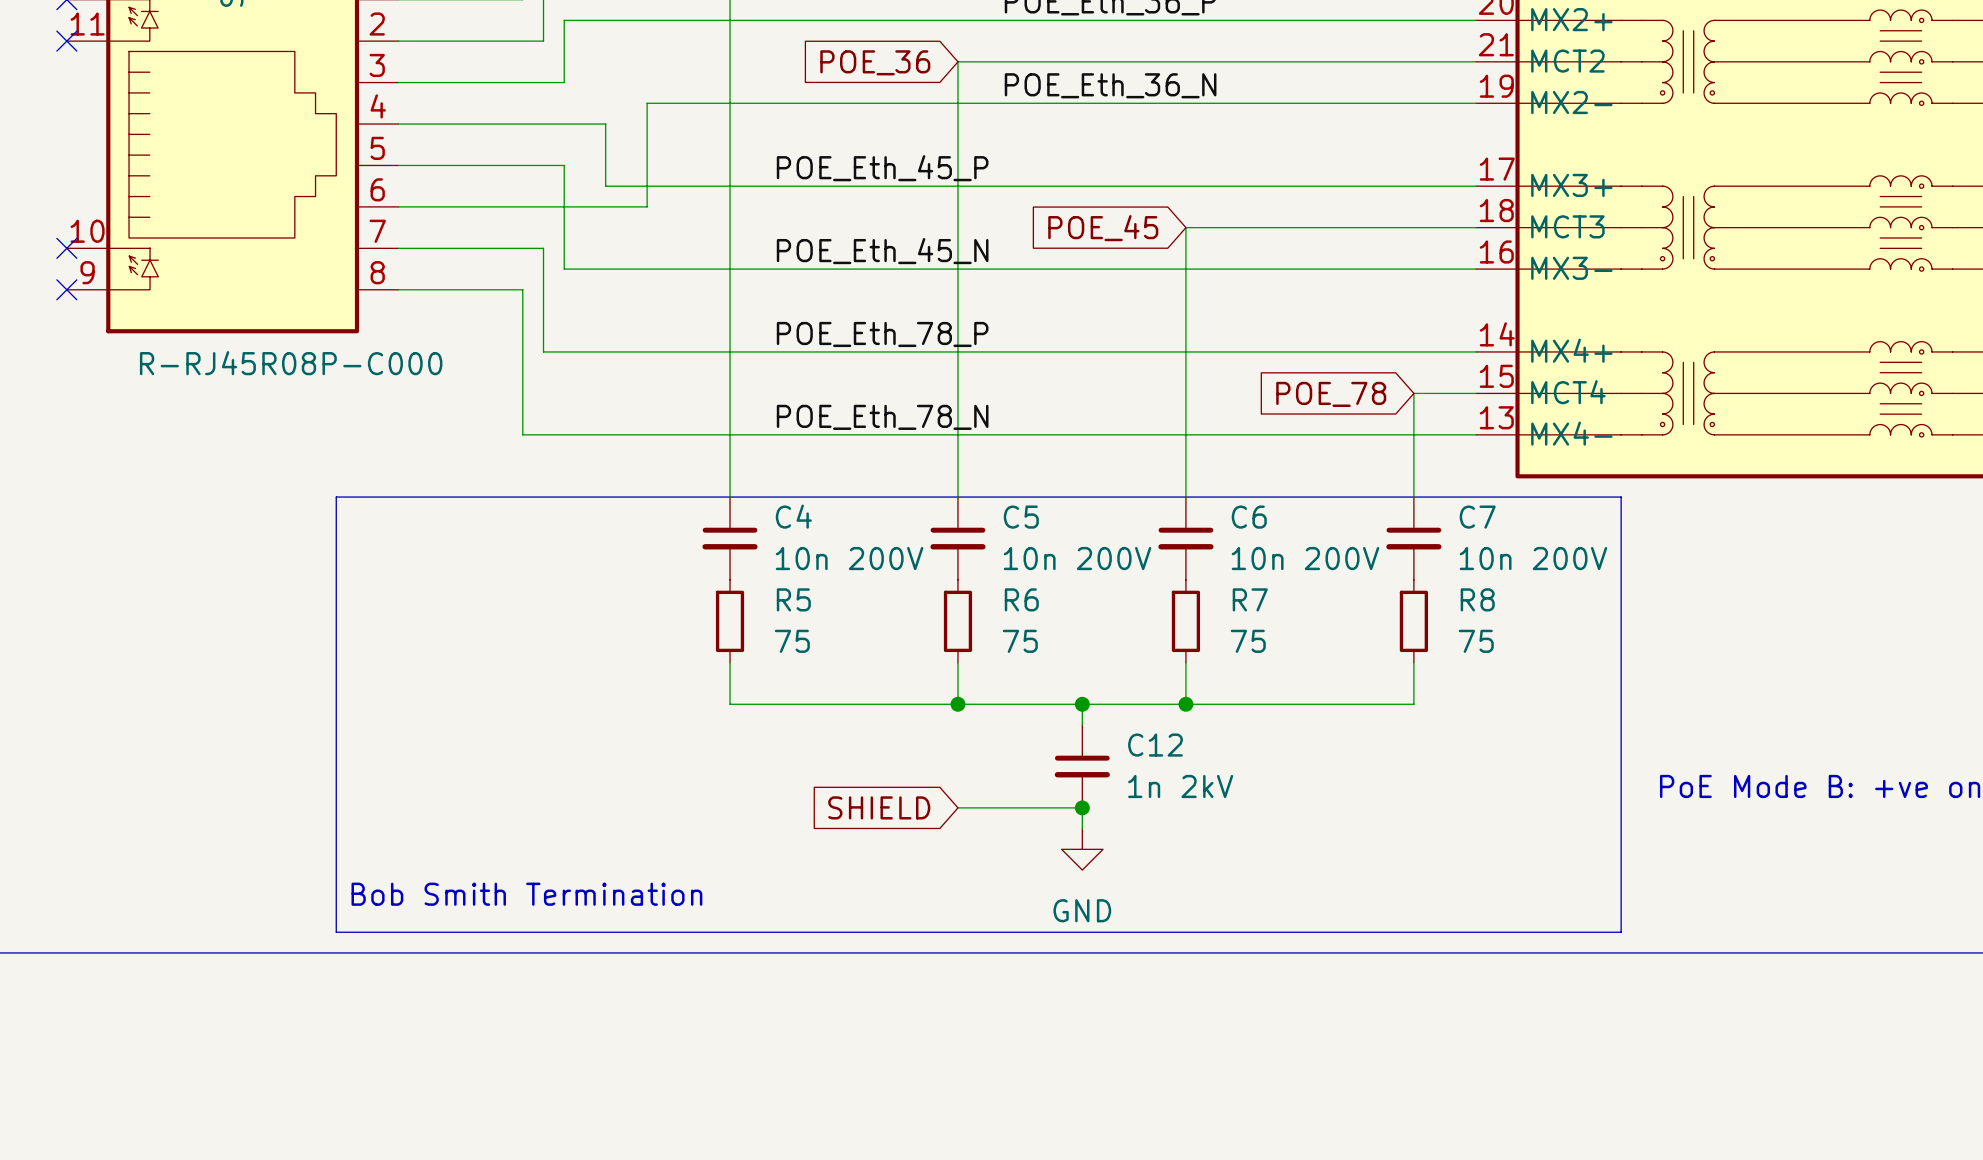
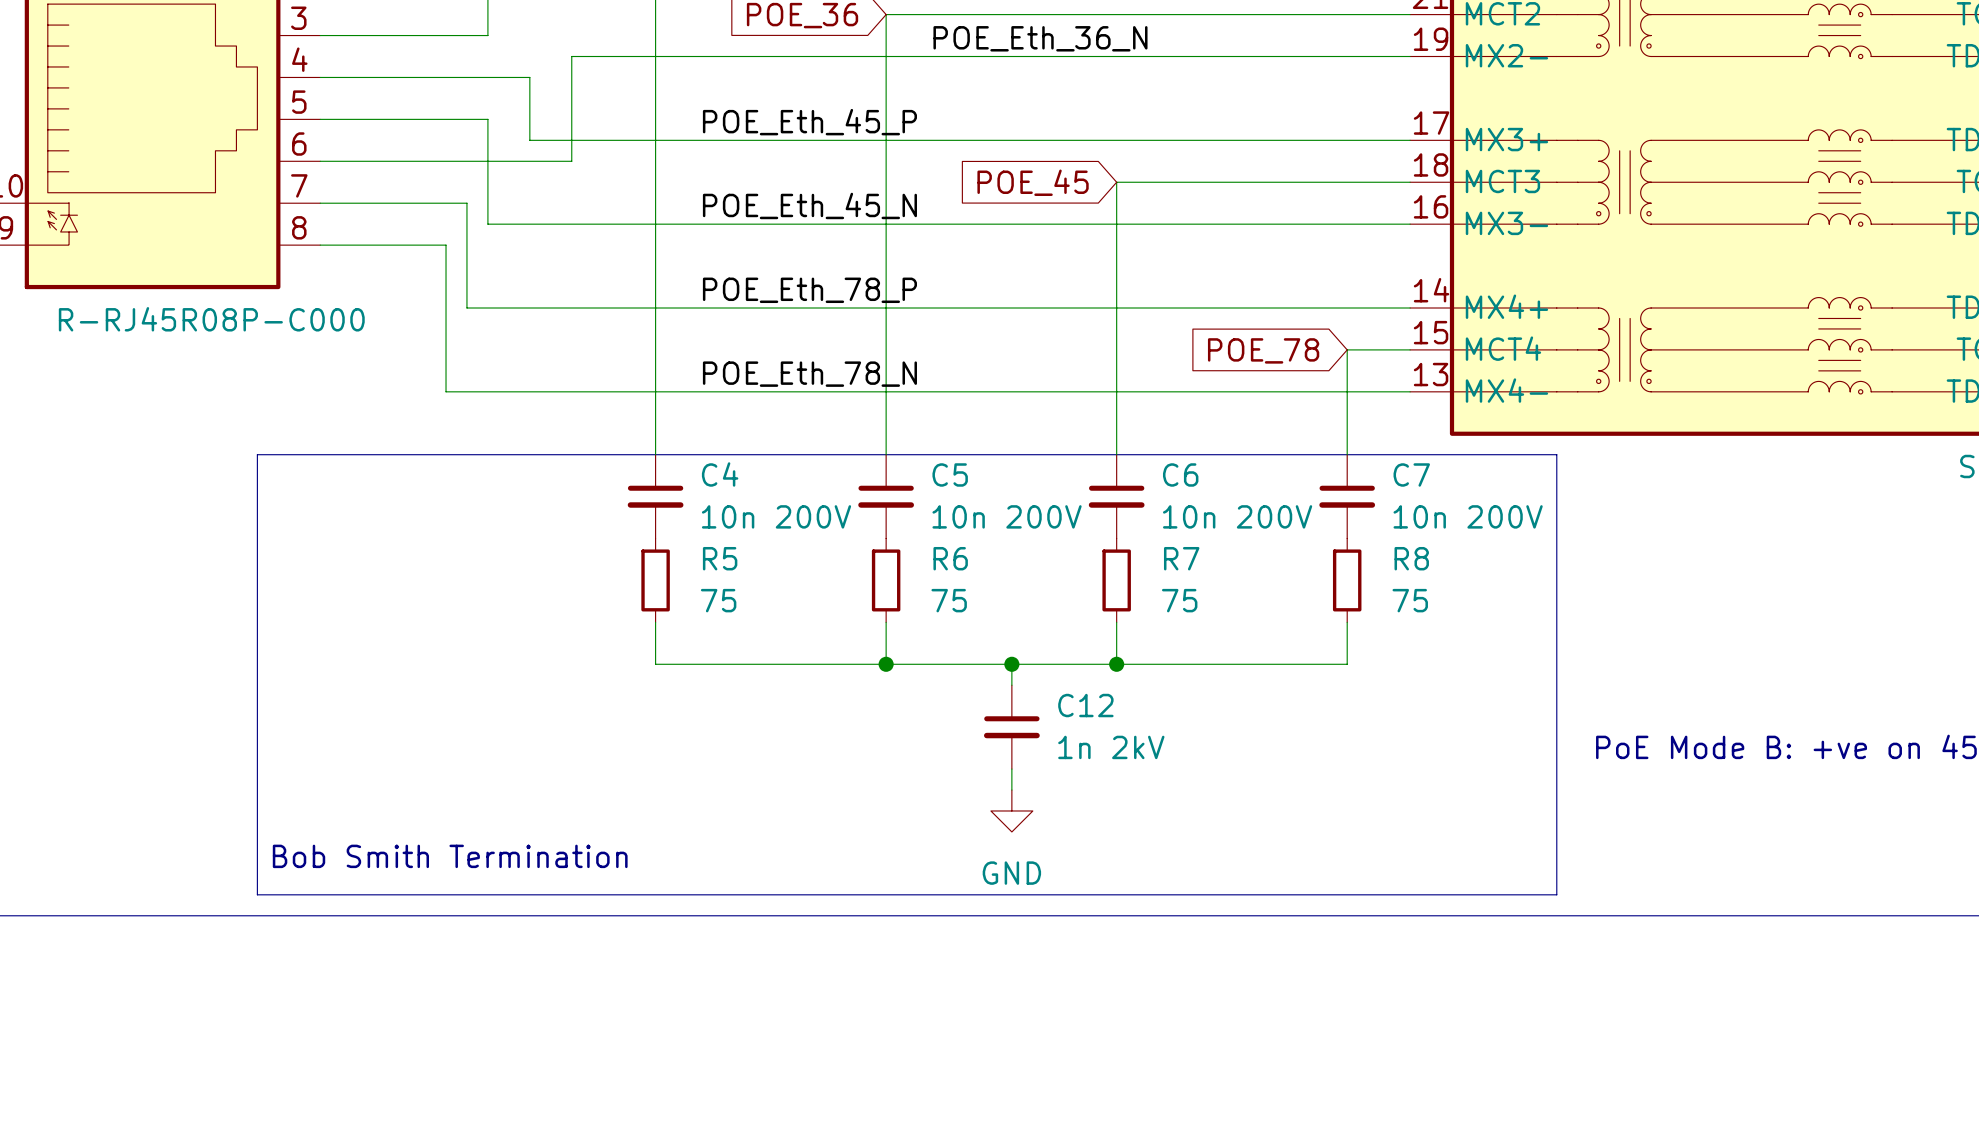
global label: SHIELD (879, 807) -> none
wire: (957, 807) (1082, 807) -> none
junction: (1082, 807) -> none

